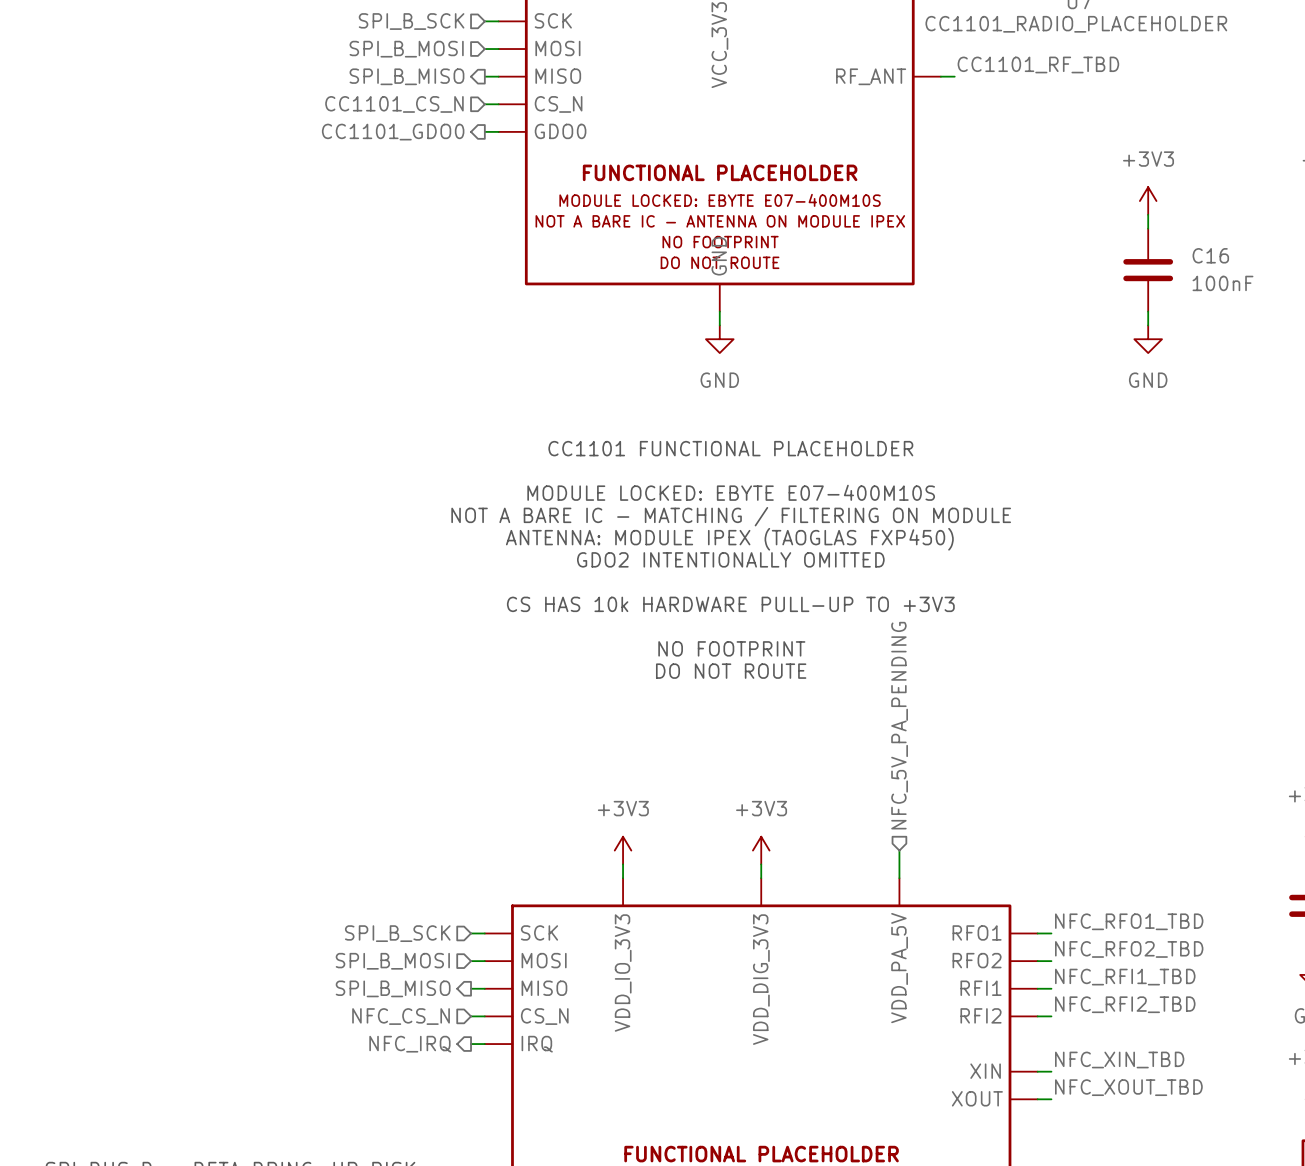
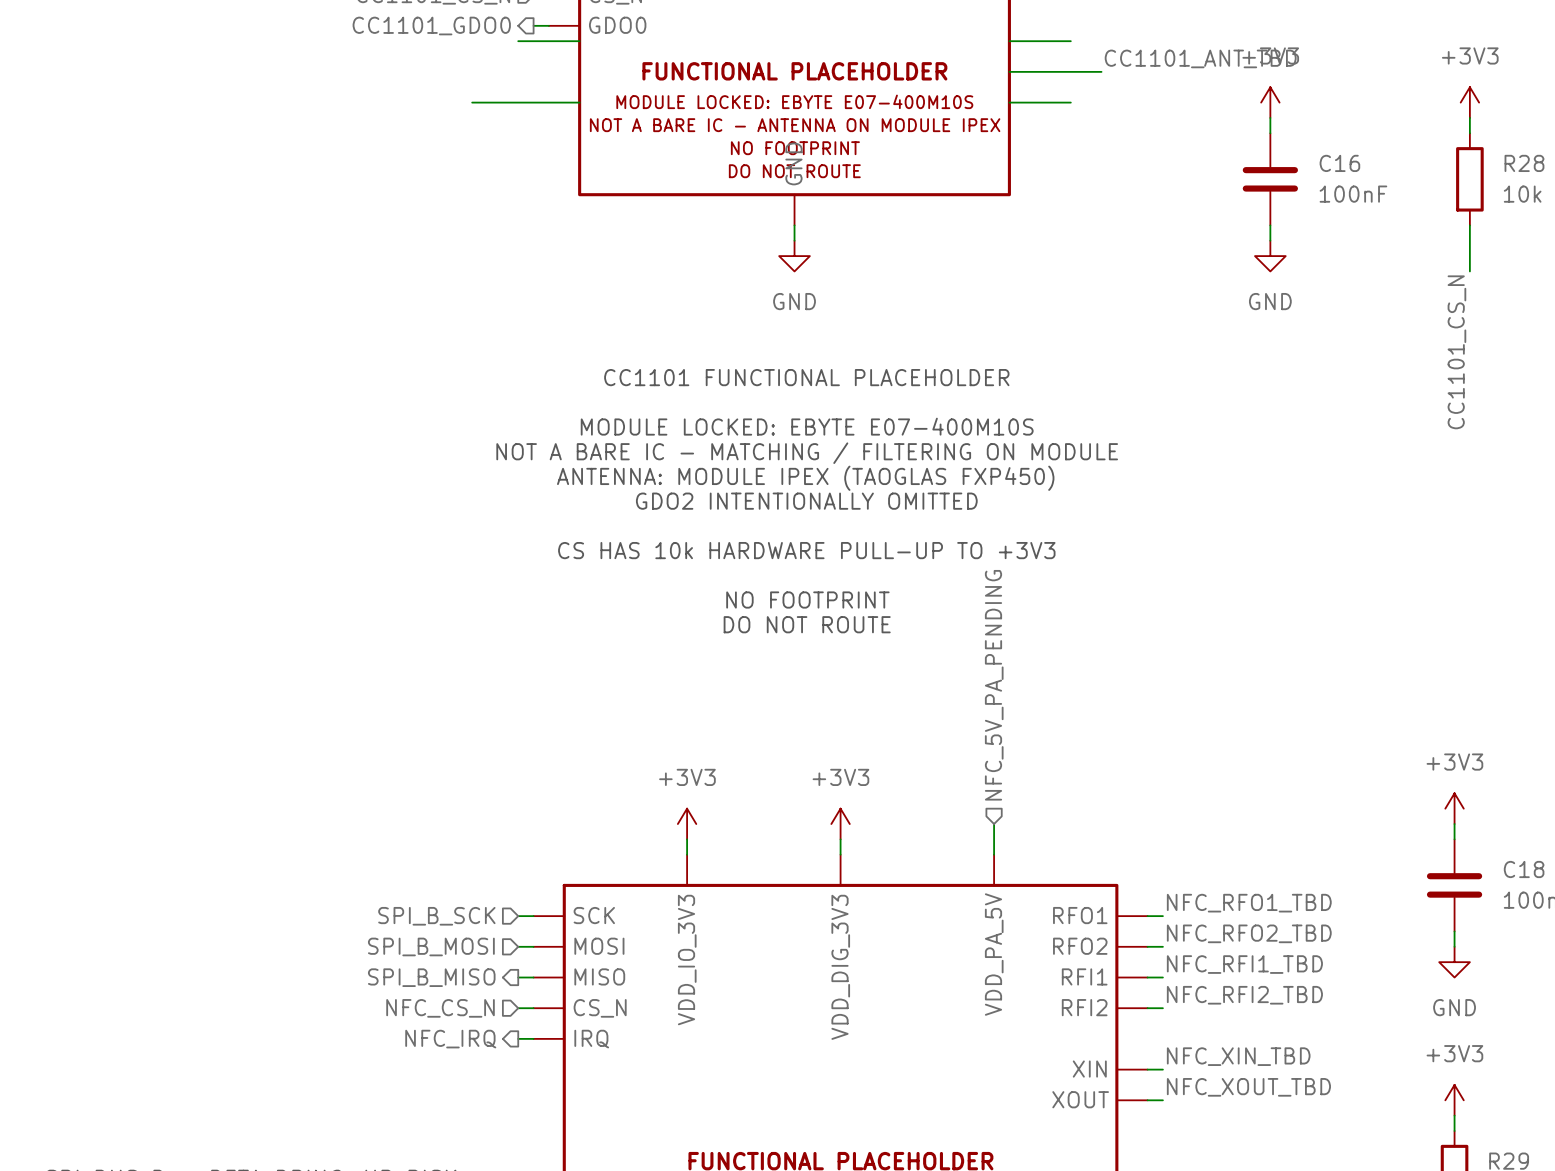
wire: none -> (518, 41) (579, 41)
wire: none -> (1009, 41) (1070, 41)
label: none -> CC1101_ANT_TBD (1200, 58)
wire: none -> (1009, 71) (1101, 71)
wire: none -> (472, 102) (579, 102)
wire: none -> (1009, 102) (1070, 102)

